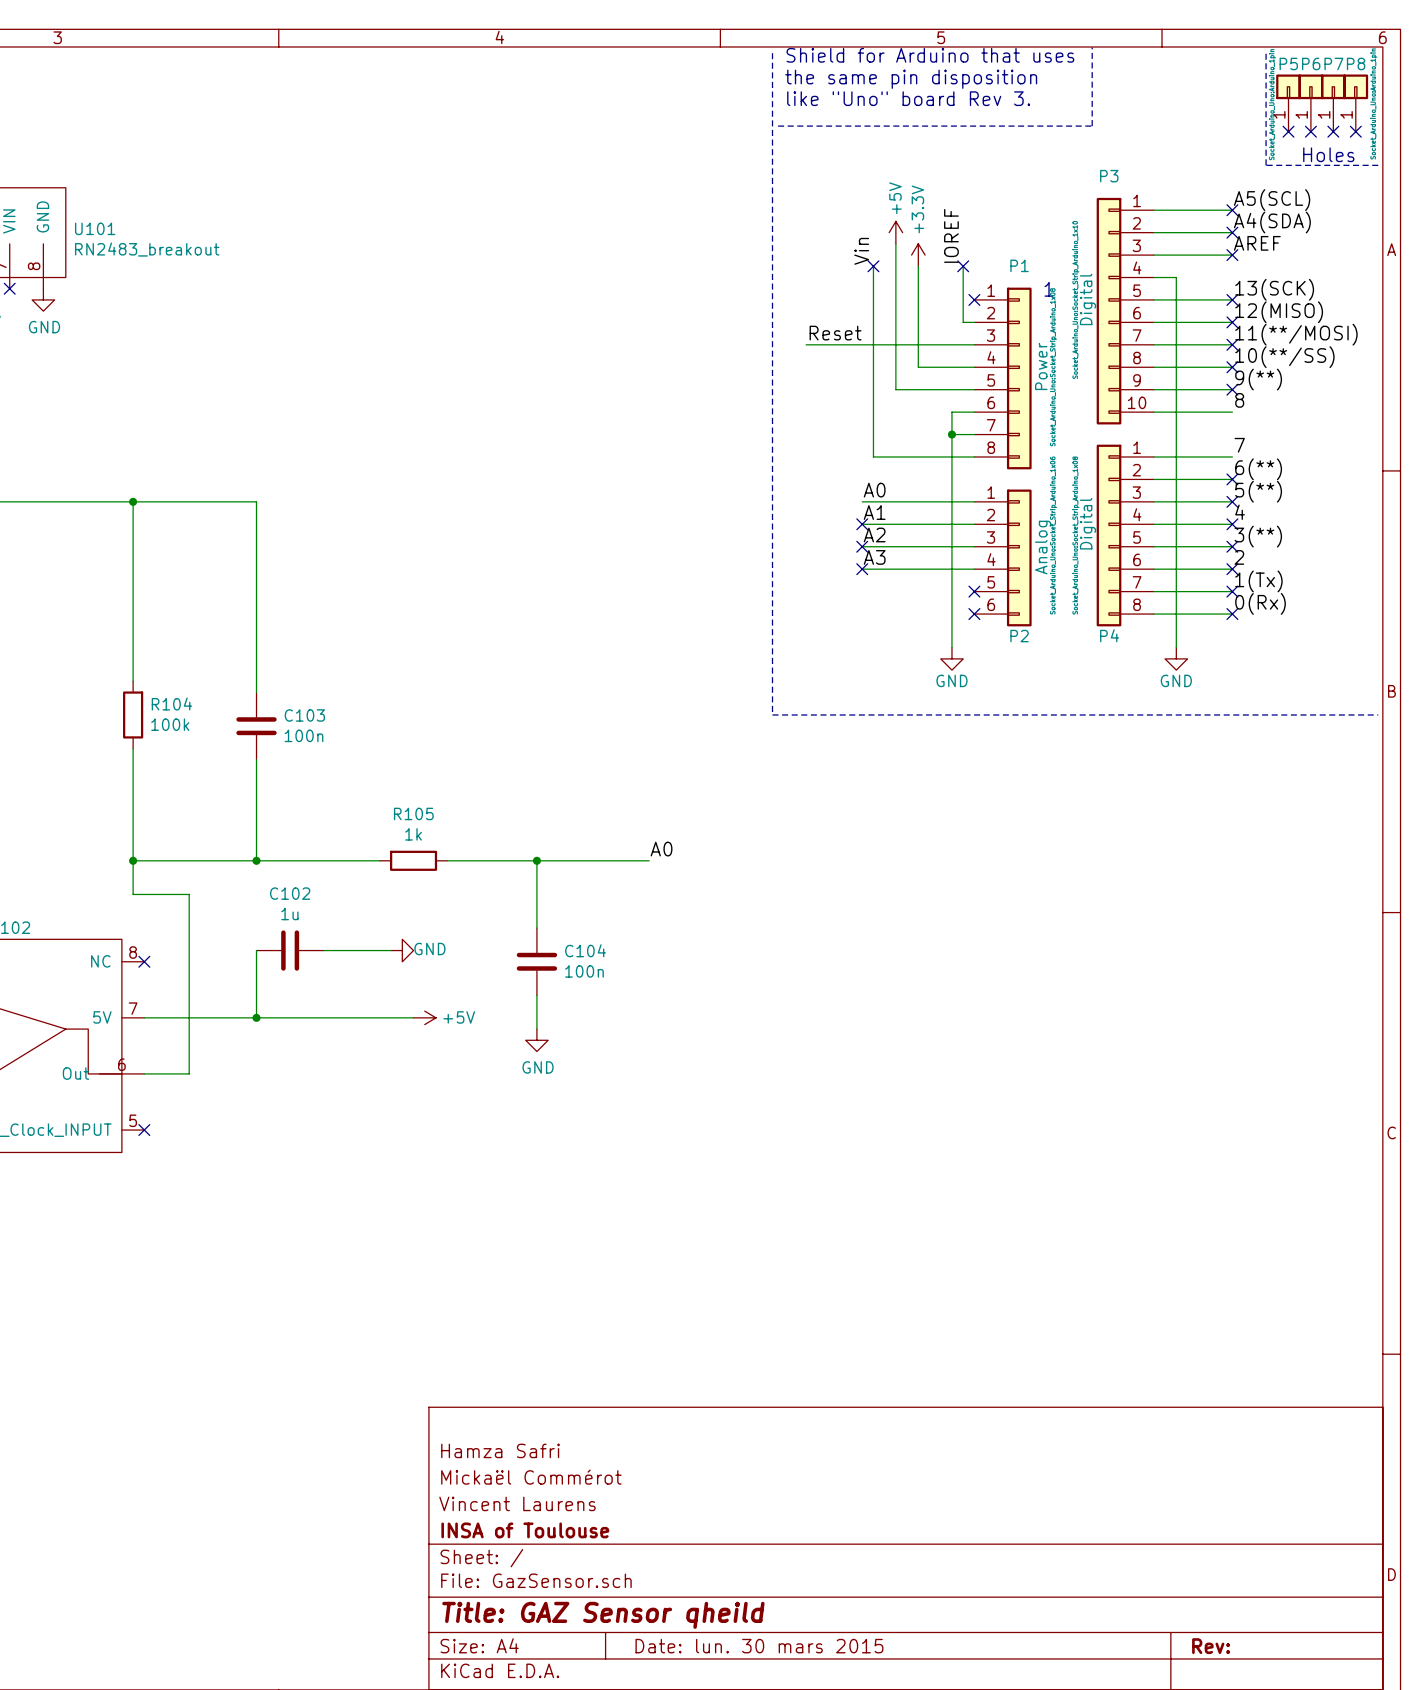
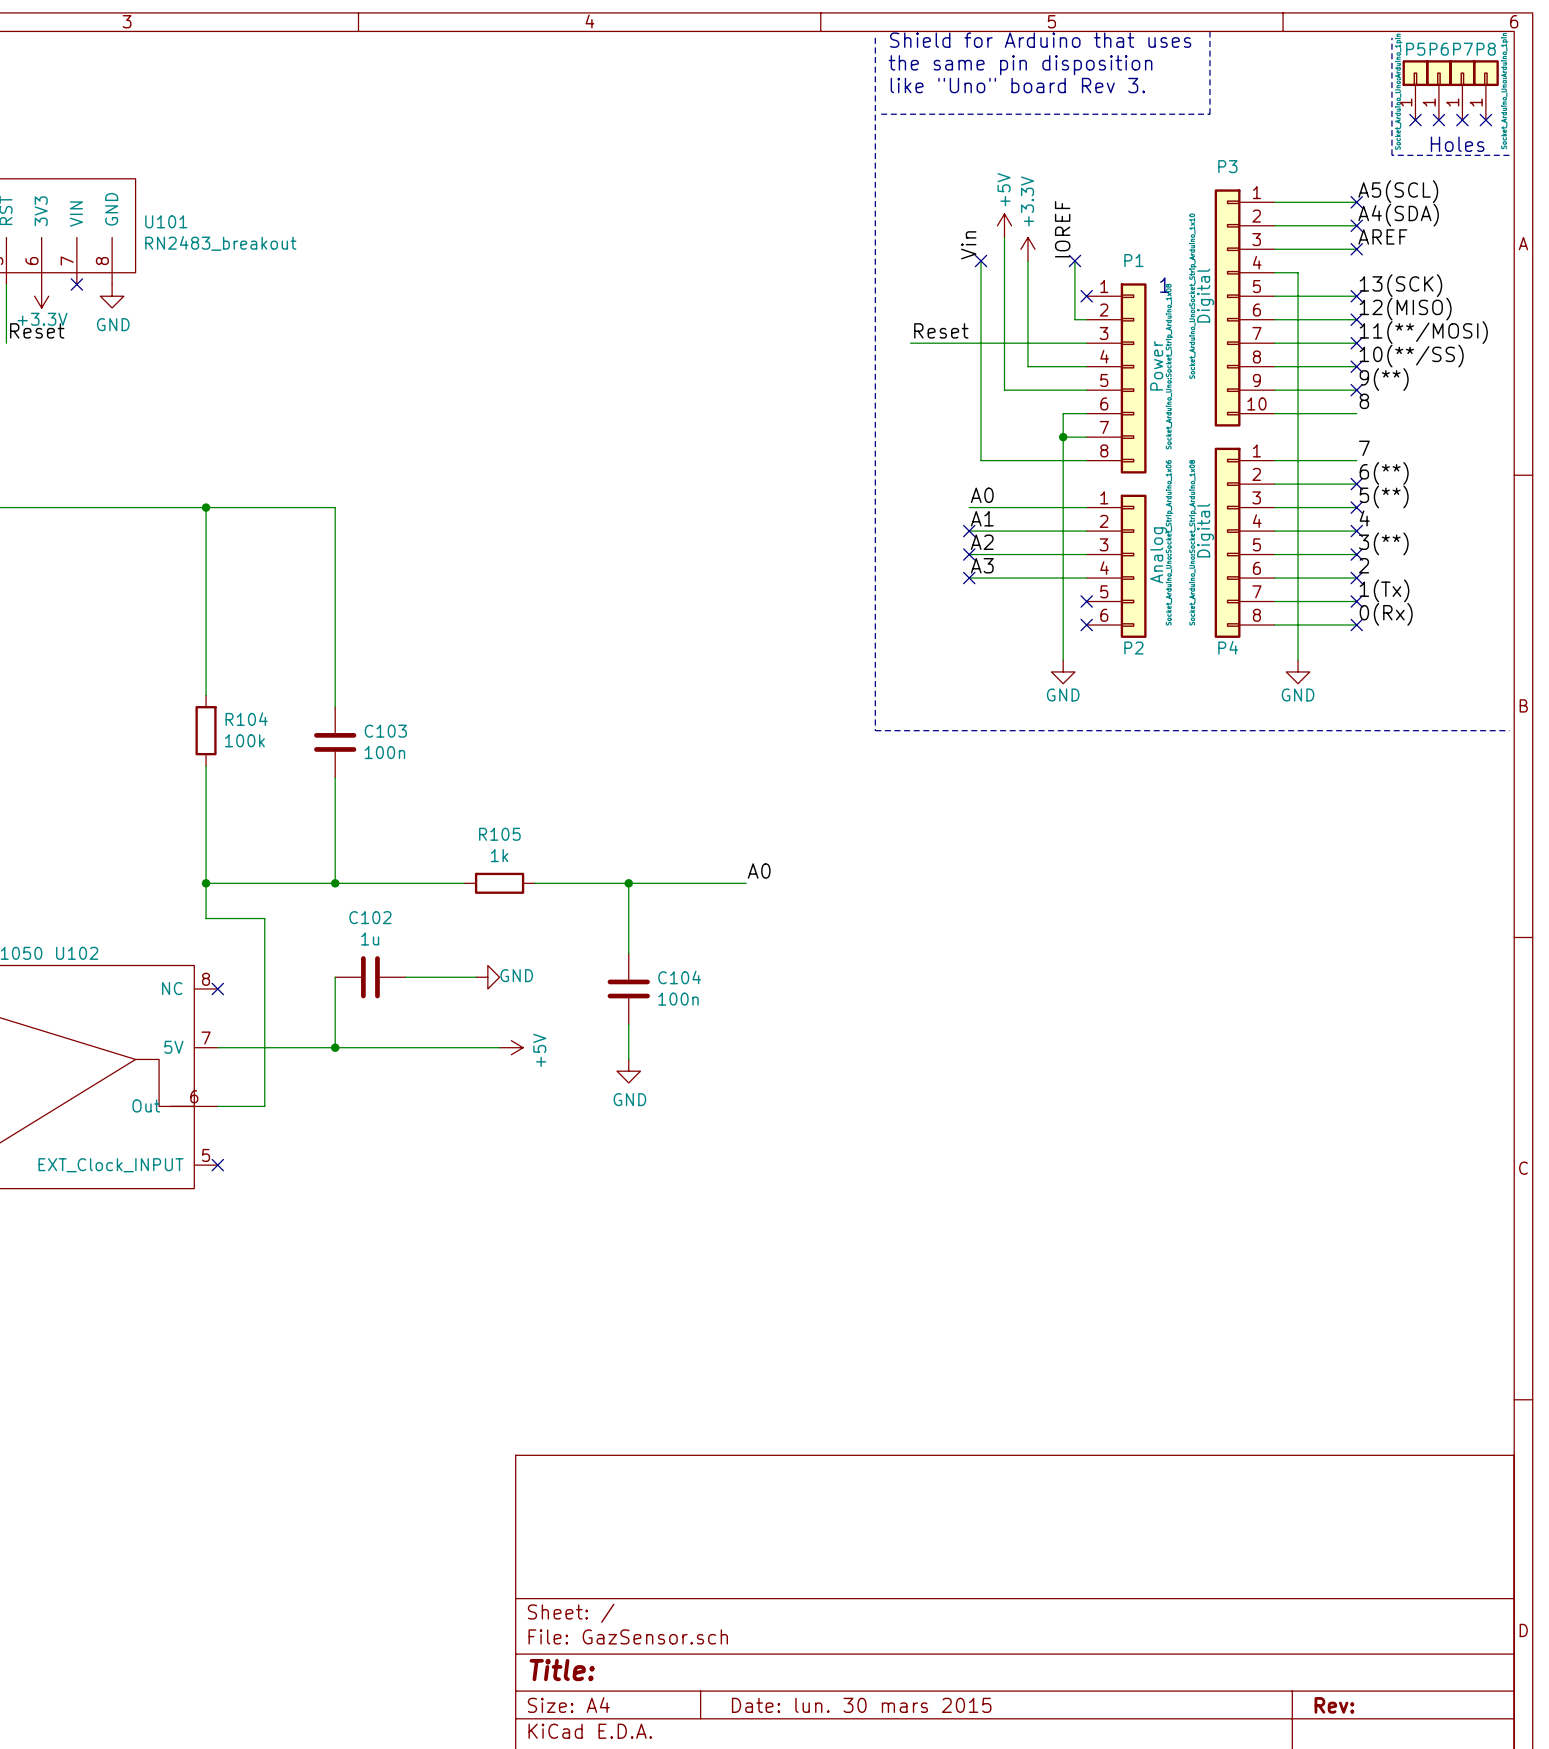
power symbol text rotation: 0° (459, 1017) -> 90° counterclockwise (539, 1050)
title block: Hamza Safri (500, 1450) -> none
title block: Mickaël Commérot (531, 1477) -> none
title block: Vincent Laurens (517, 1503) -> none
title block: INSA of Toulouse (525, 1530) -> none
title block: Title: GAZ Sensor qheild (603, 1615) -> Title: (562, 1670)

